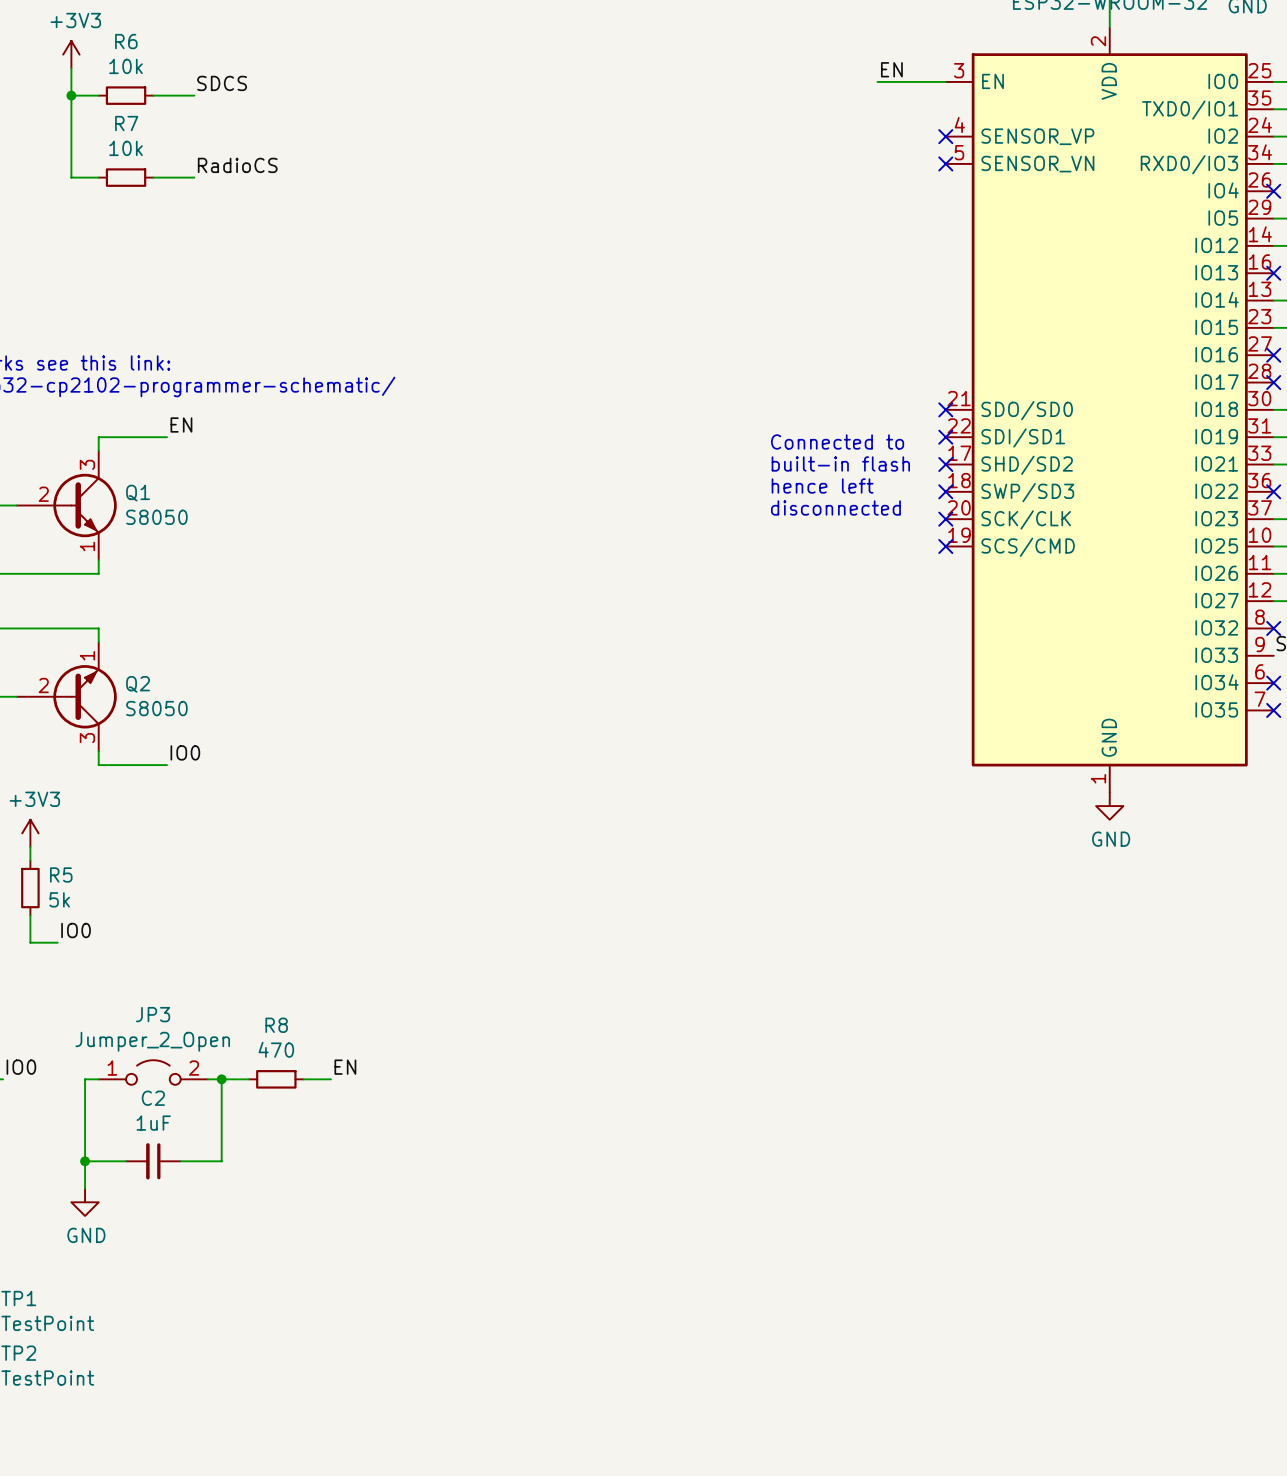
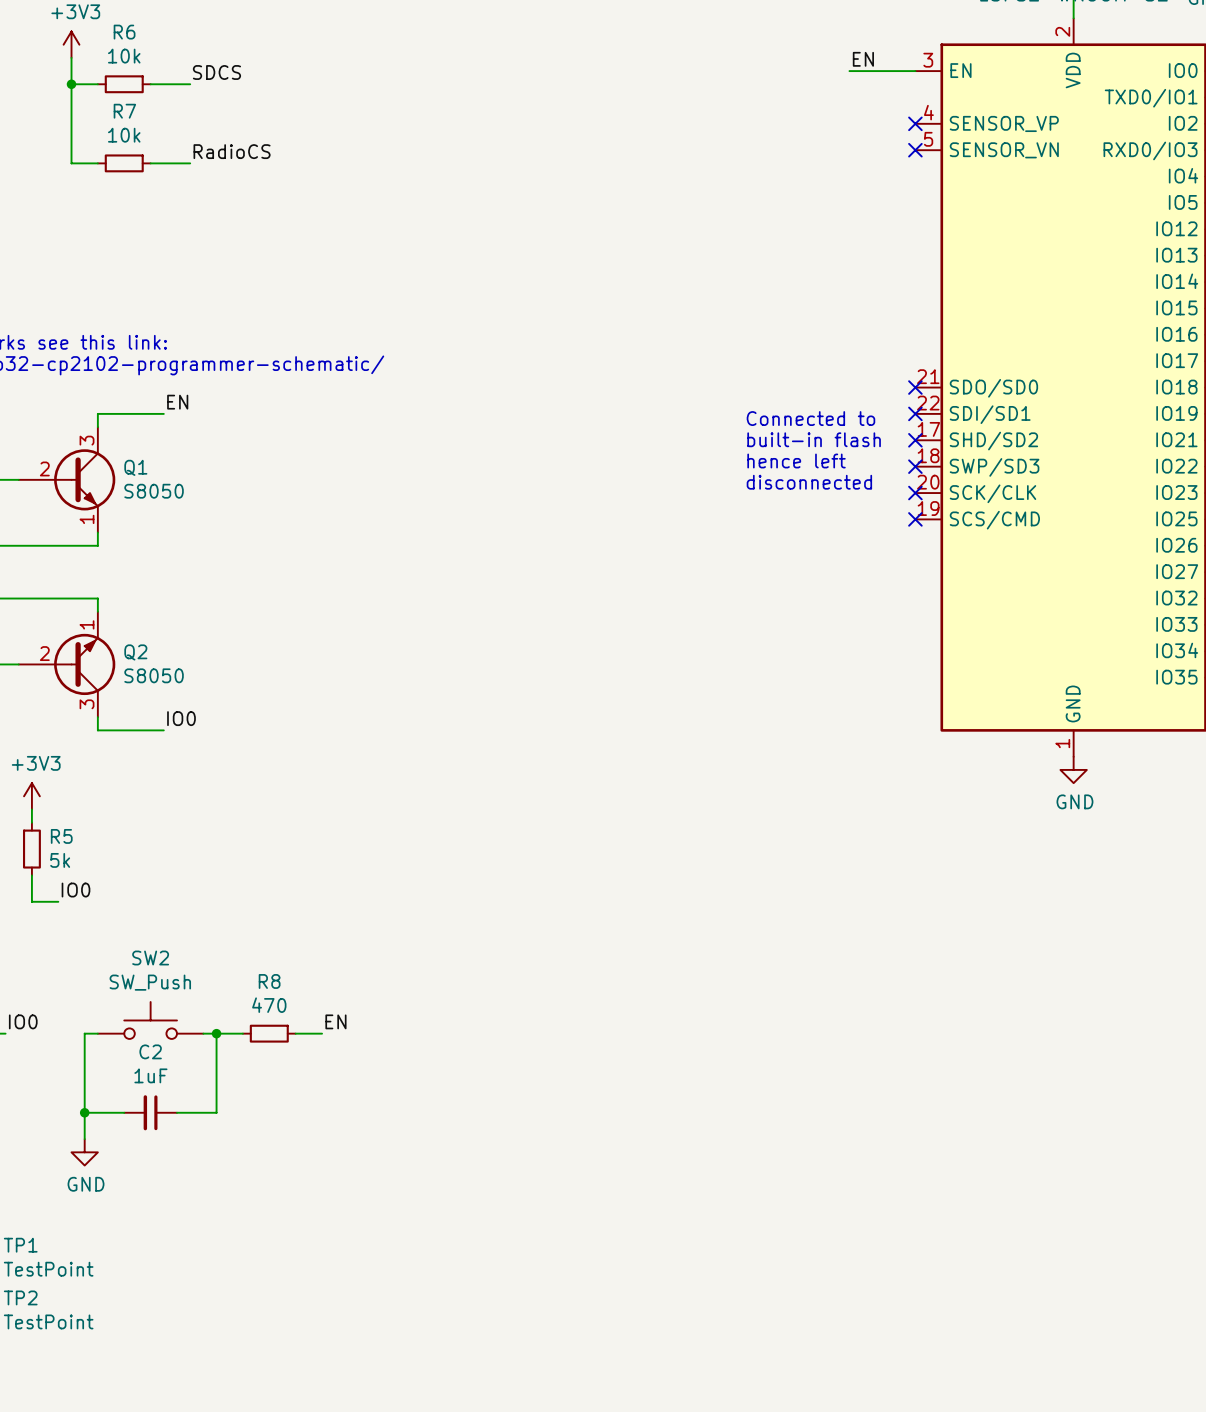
SW2: none -> SW_Push (150, 1020)
JP3: Jumper_2_Open (153, 1072) -> none

